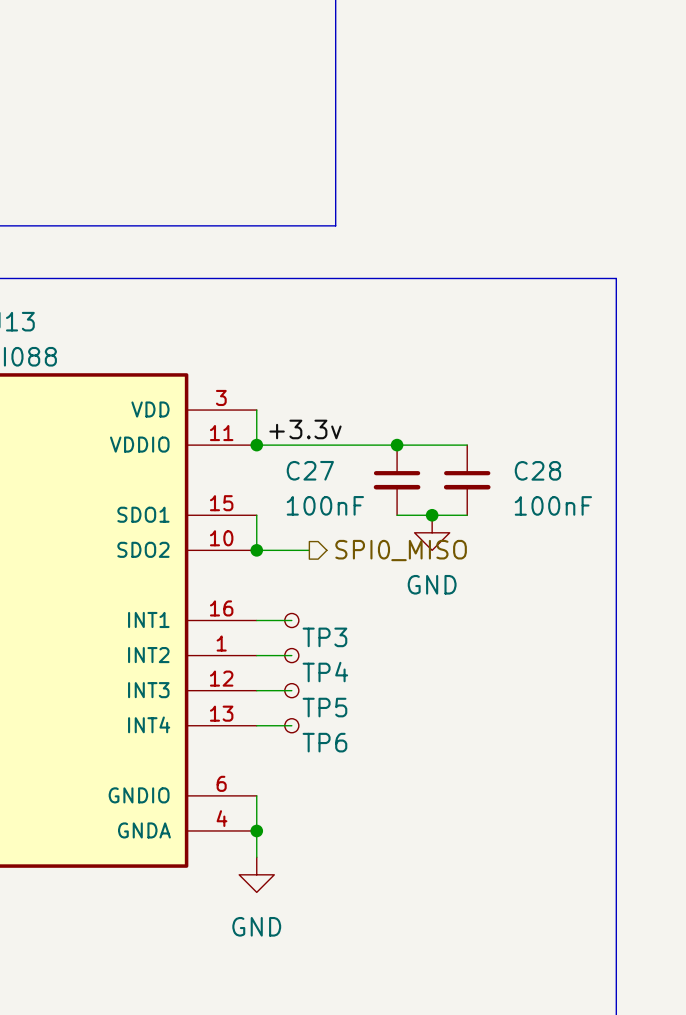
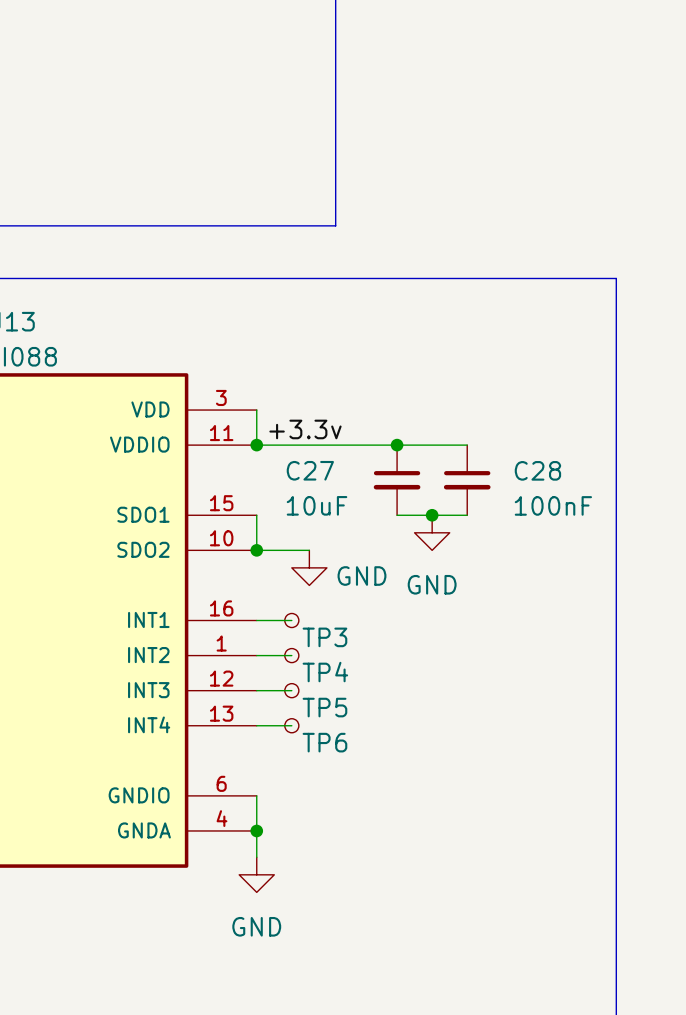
C27 value: 100nF (325, 505) -> 10uF (317, 505)
hierarchical label: SPI0_MISO (401, 550) -> none
power symbol: none -> GND (309, 567)

